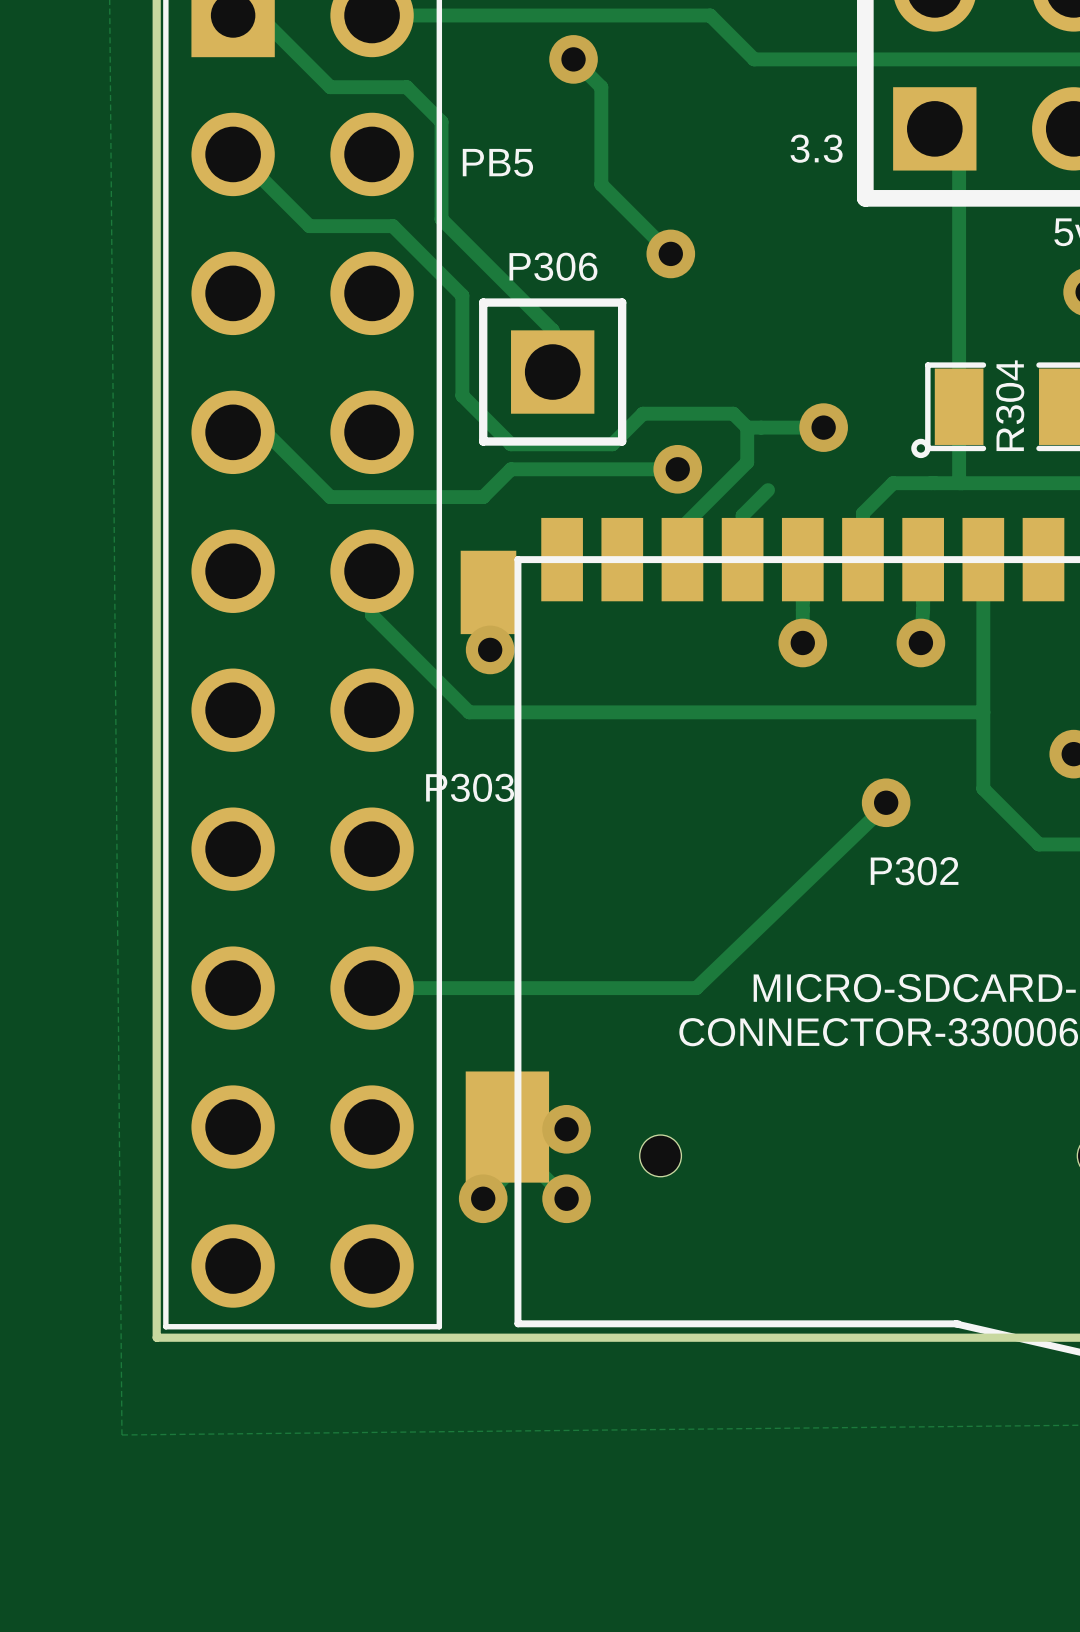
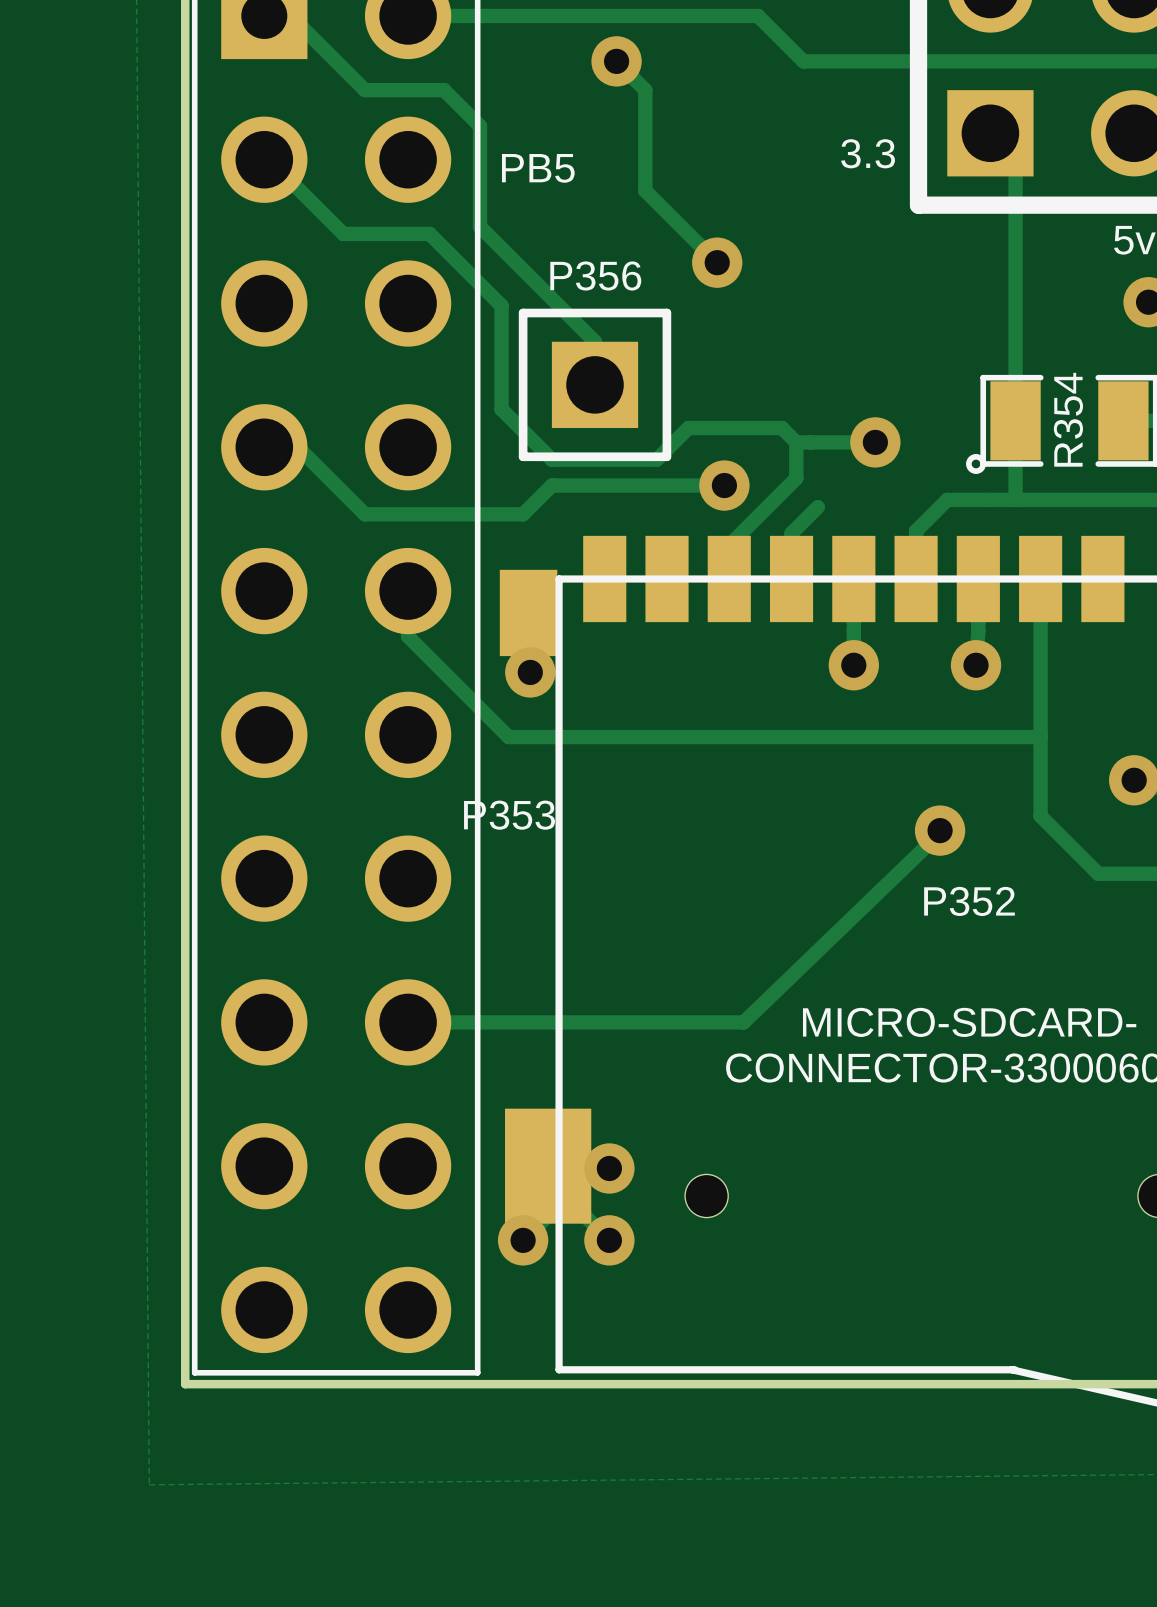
P306 name: P306 (553, 266) -> P356 (595, 275)
R304 name: R304 (1010, 405) -> R354 (1068, 419)
P303 name: P303 (470, 787) -> P353 (509, 815)
P302 name: P302 (914, 871) -> P352 (969, 901)

